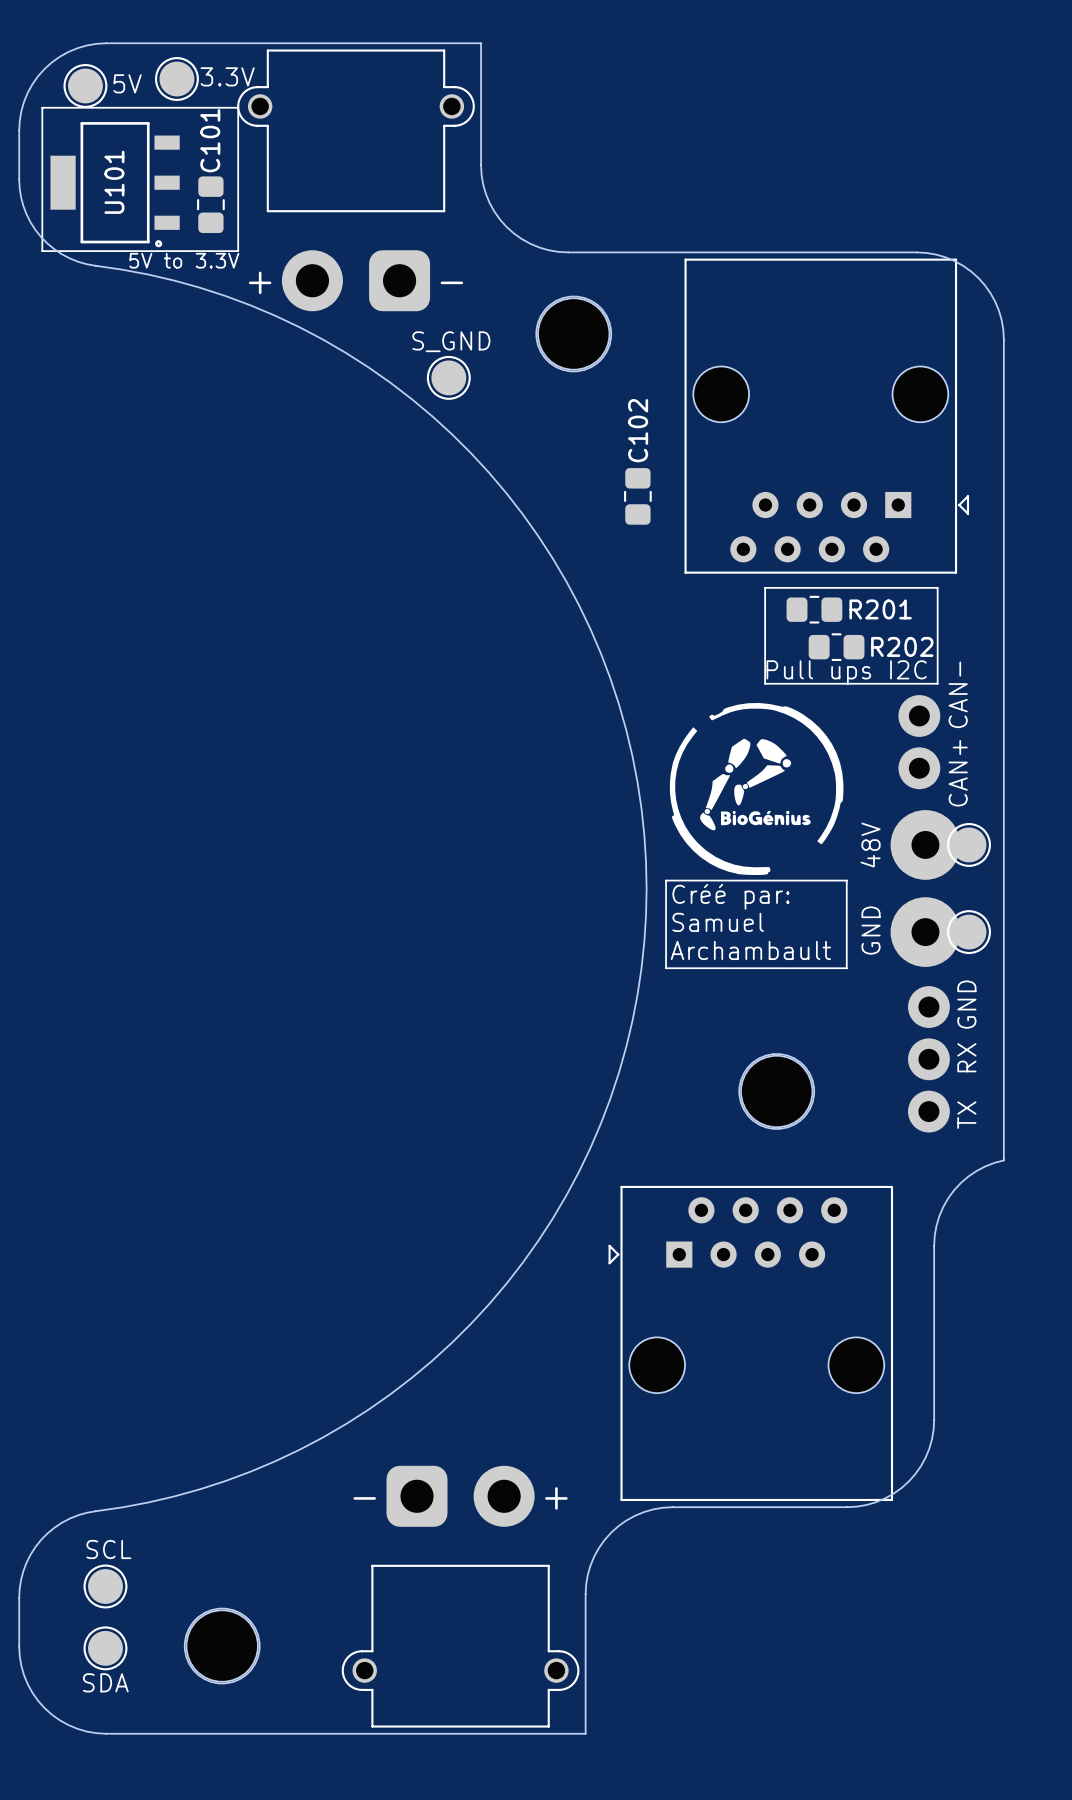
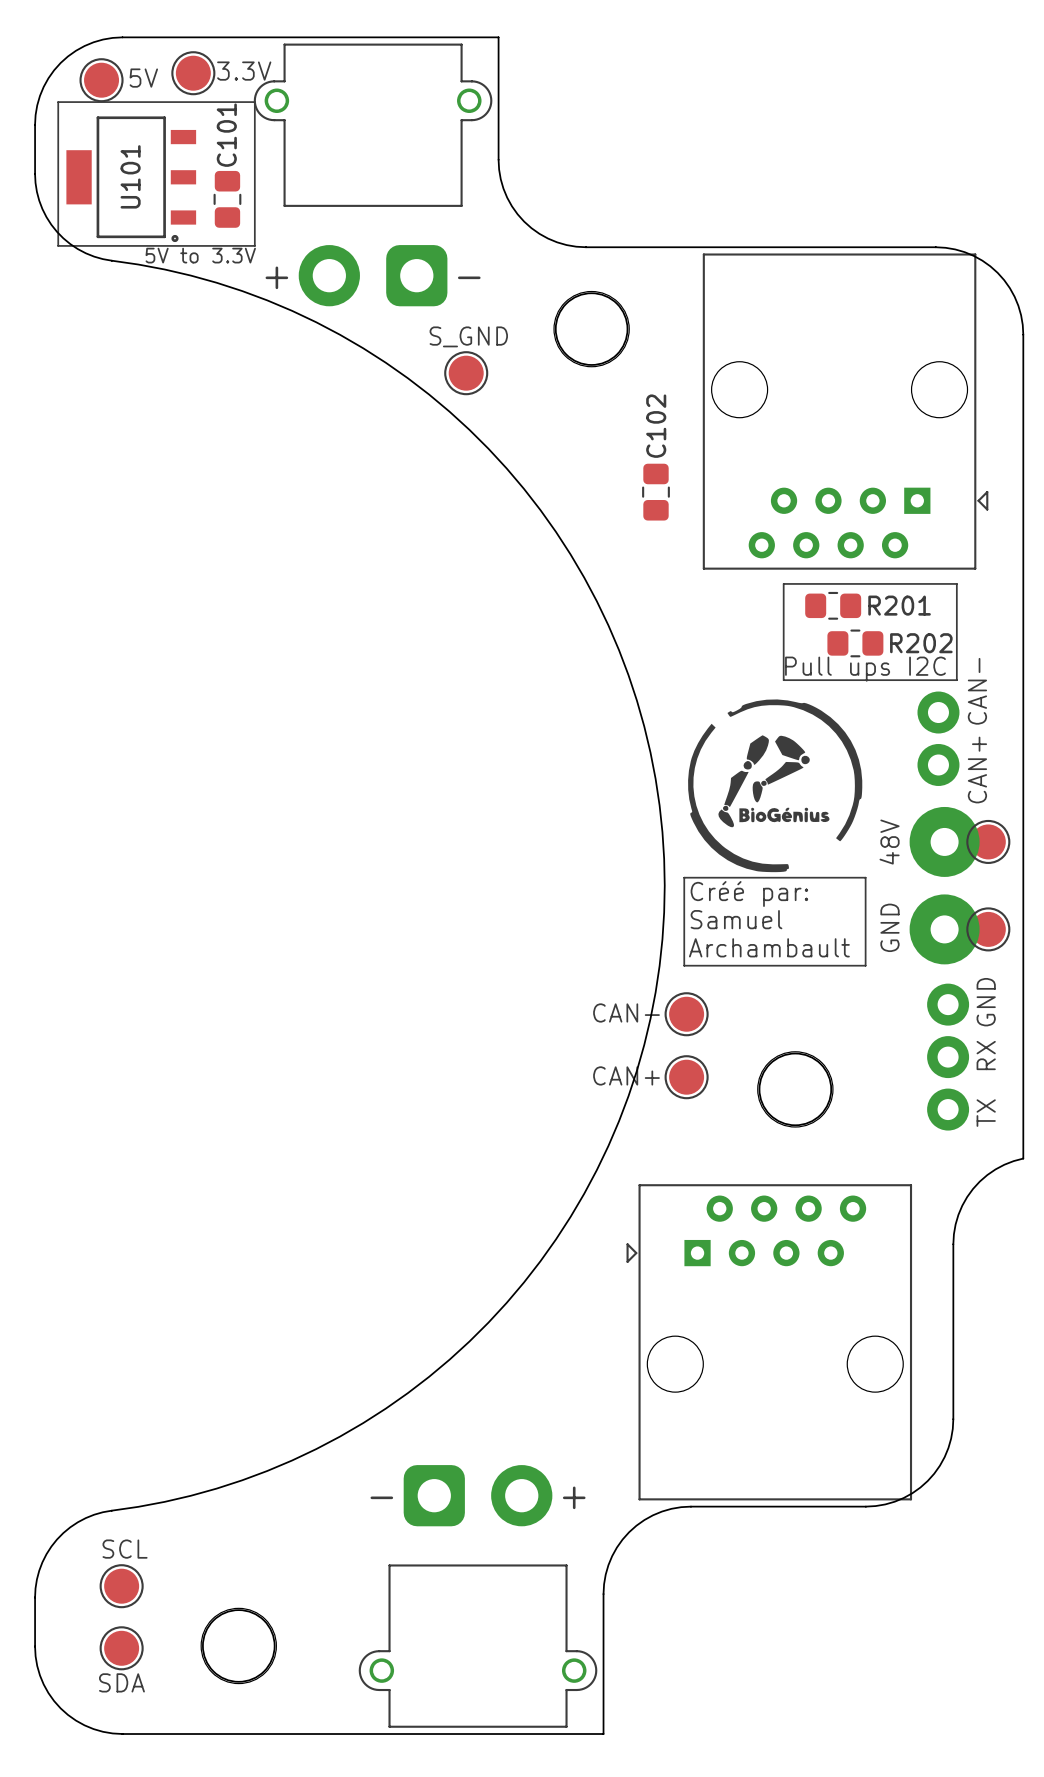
text: none -> CAN- (626, 1012)
part: none -> (686, 1014)
text: none -> CAN+ (626, 1075)
part: none -> (686, 1077)

